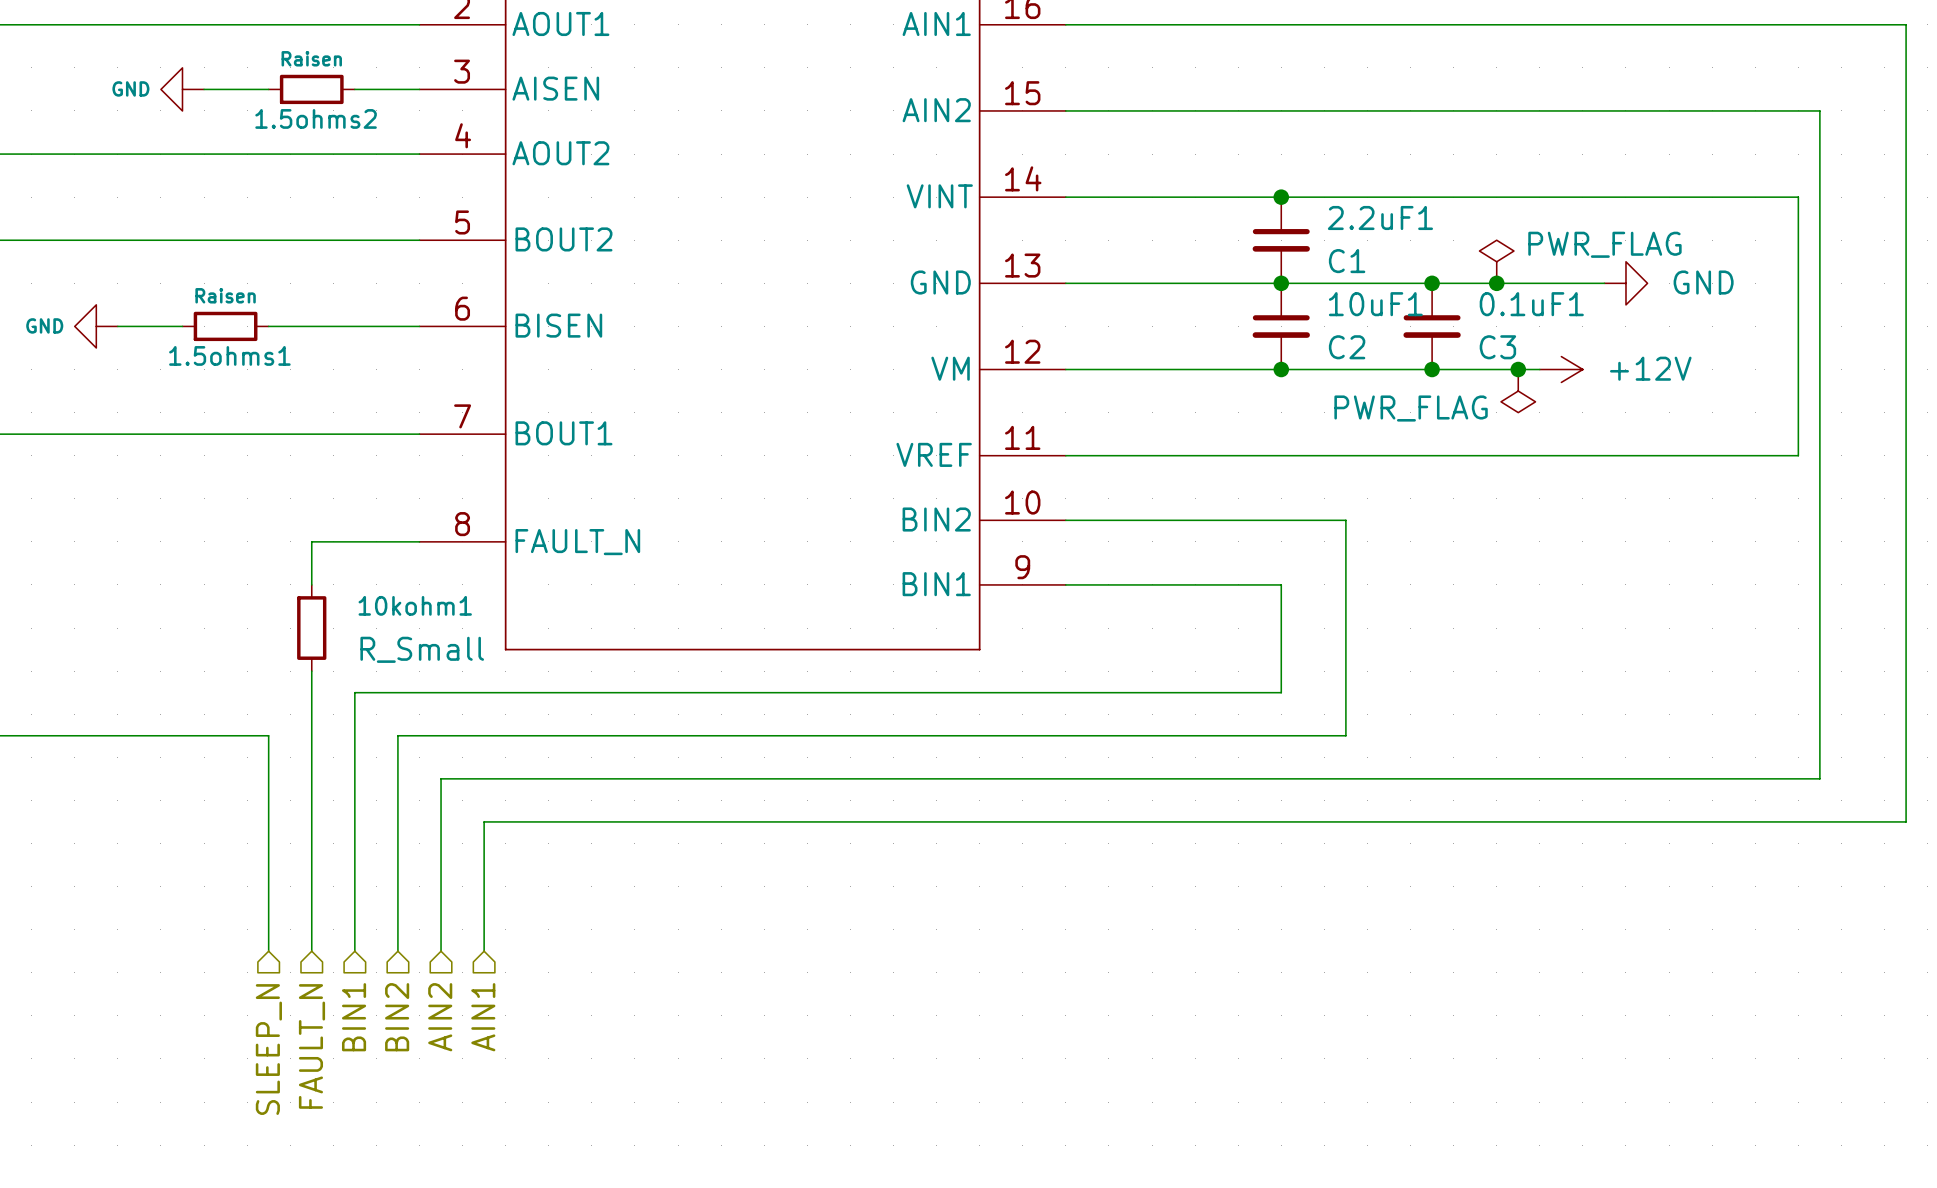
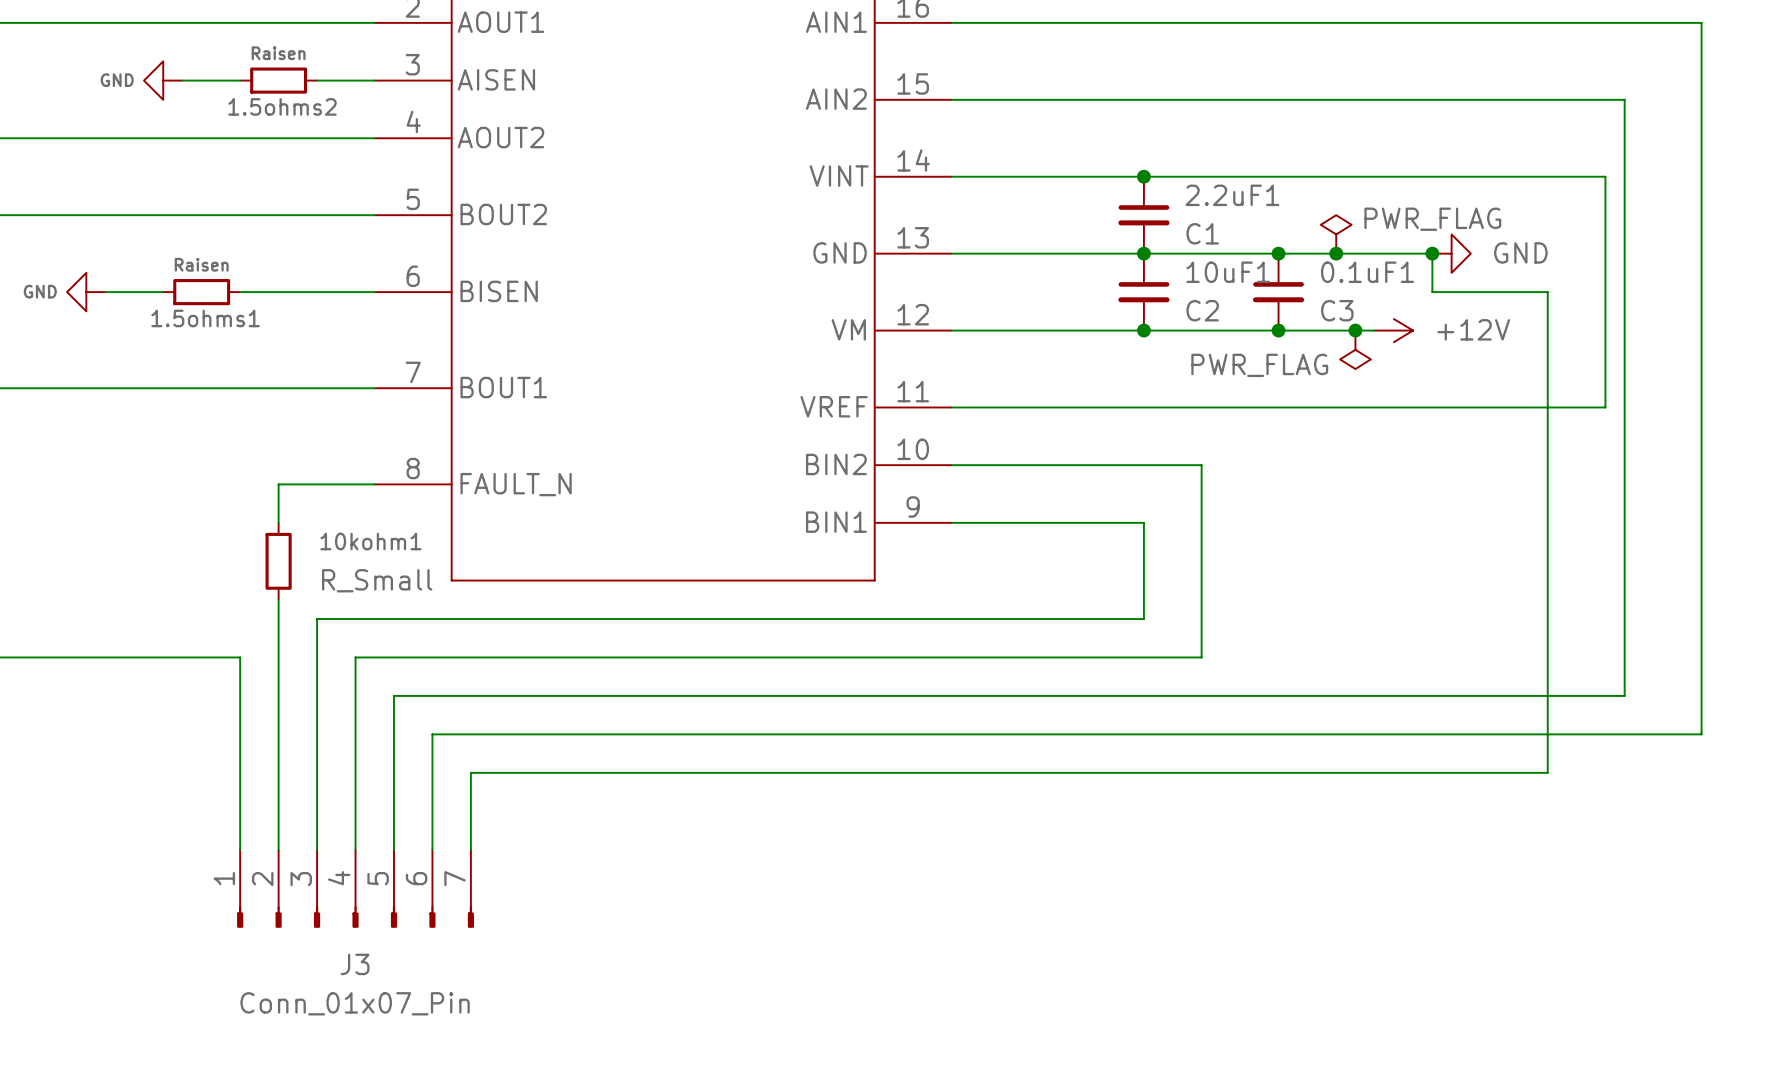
wire: none -> (1432, 253) (1432, 292) (1547, 292) (1547, 772) (470, 772) (470, 849)
junction: none -> (1432, 253)
J3: none -> Conn_01x07_Pin (355, 888)
hierarchical label: BIN1 (354, 1017) -> none
hierarchical label: BIN2 (397, 1017) -> none
hierarchical label: AIN2 (440, 1017) -> none
hierarchical label: AIN1 (483, 1017) -> none
hierarchical label: FAULT_N (311, 1046) -> none
hierarchical label: SLEEP_N (268, 1049) -> none

